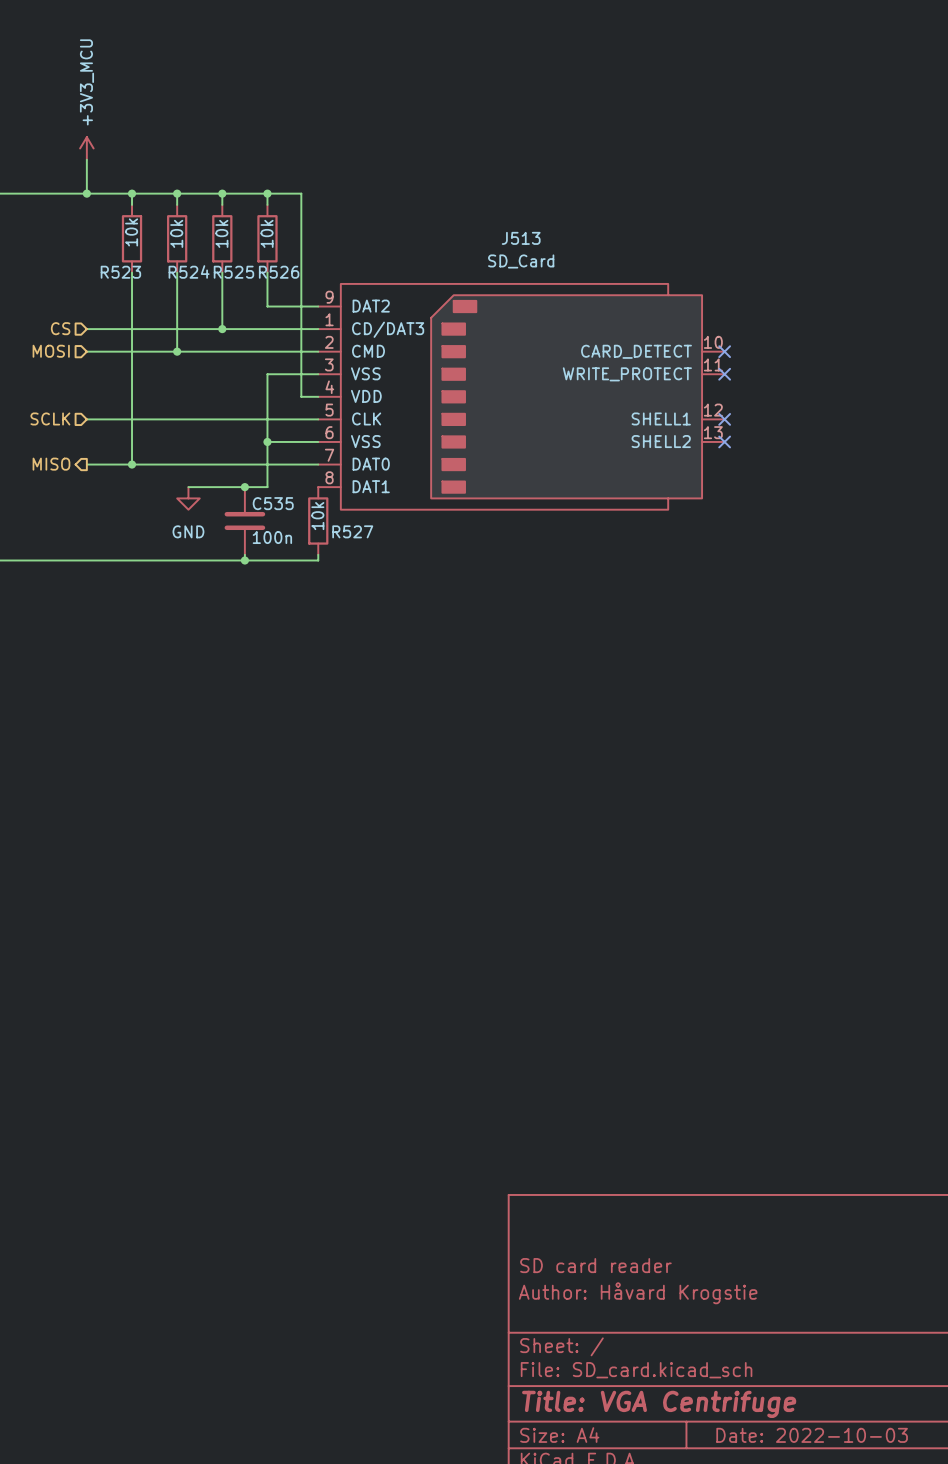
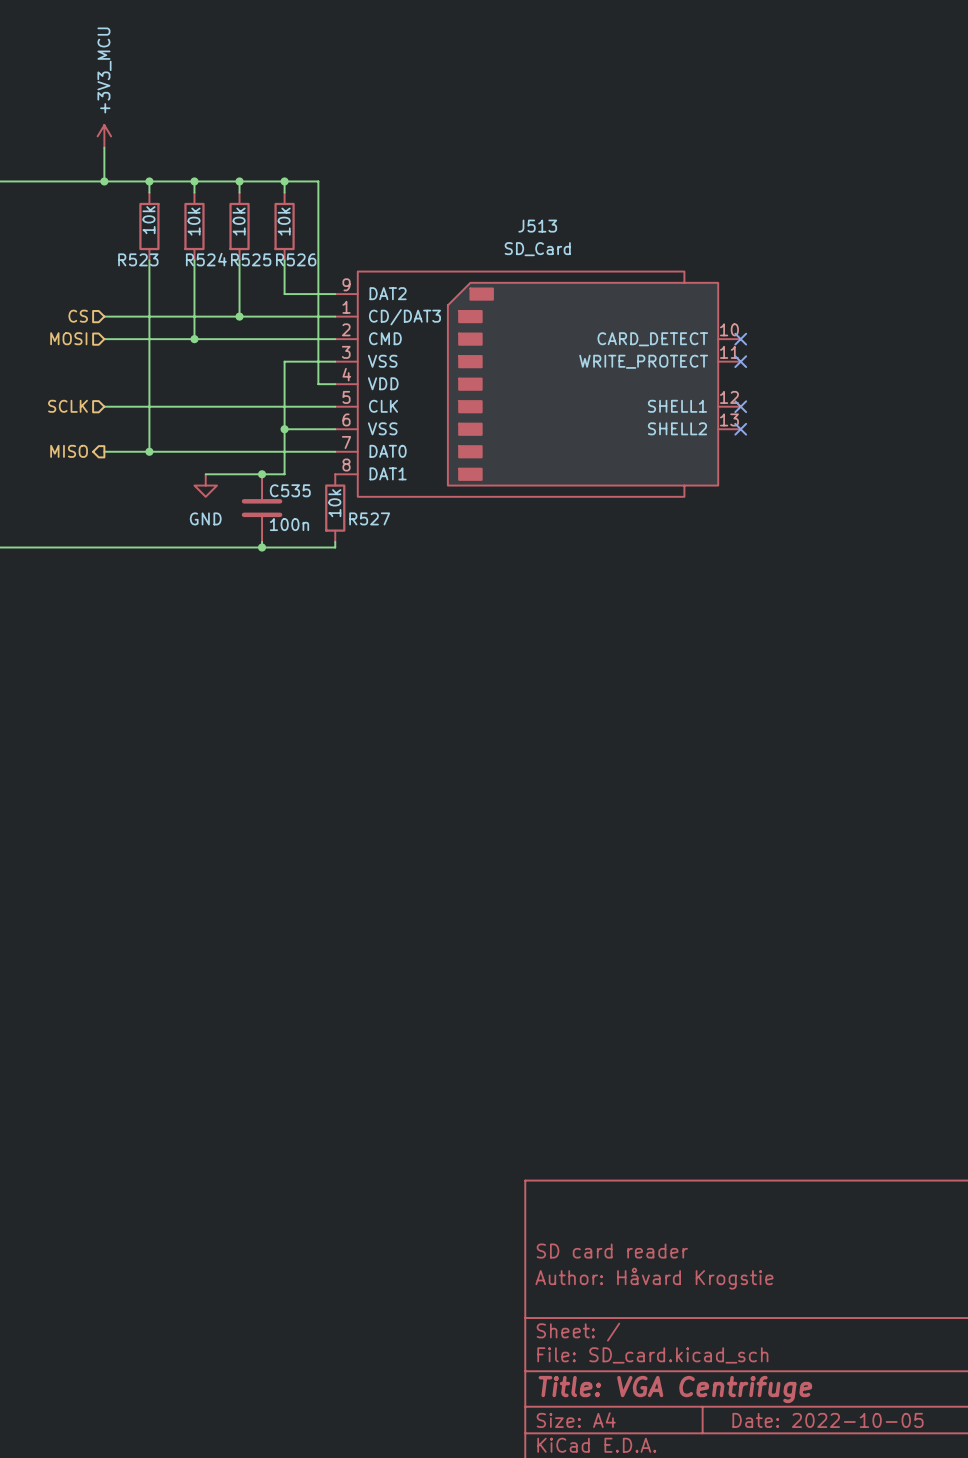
title block: Date: 2022-10-03 (812, 1435) -> Date: 2022-10-05 (828, 1420)

